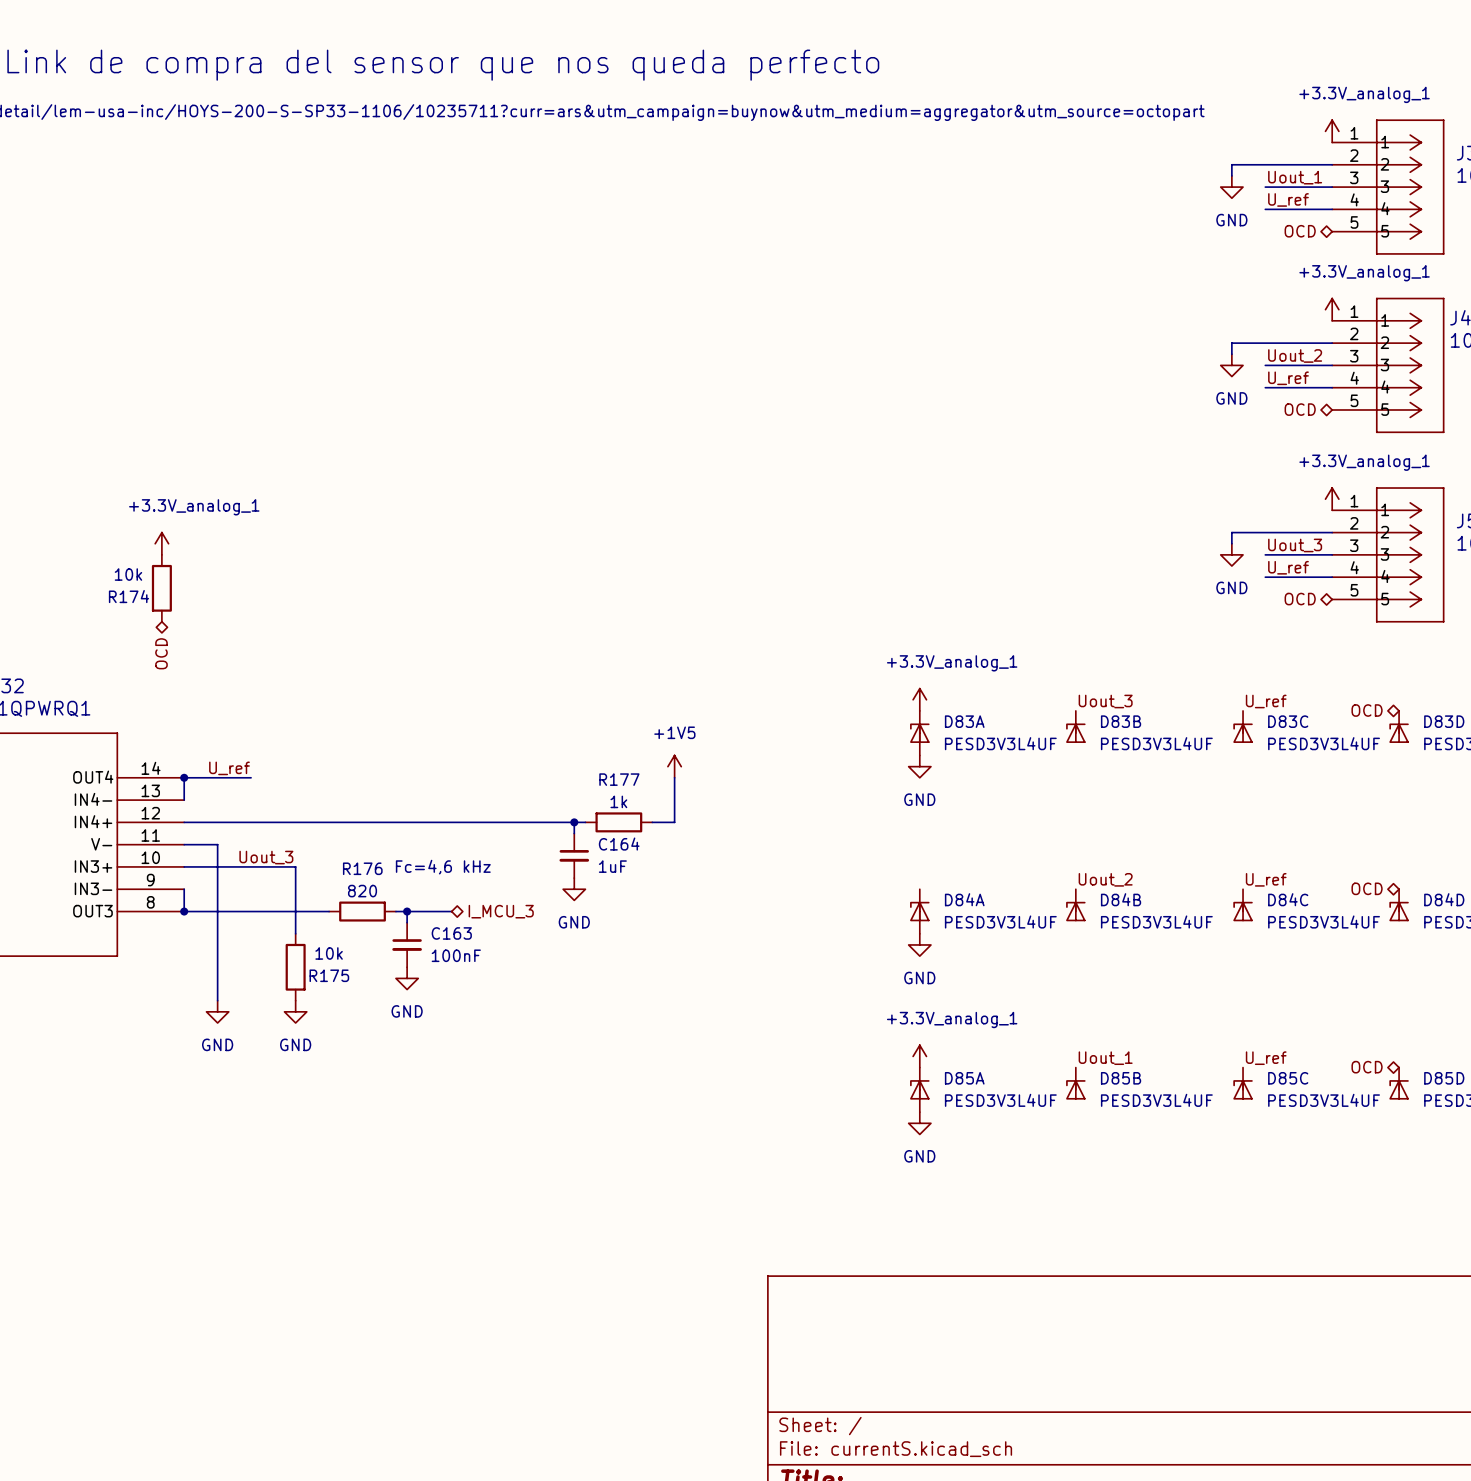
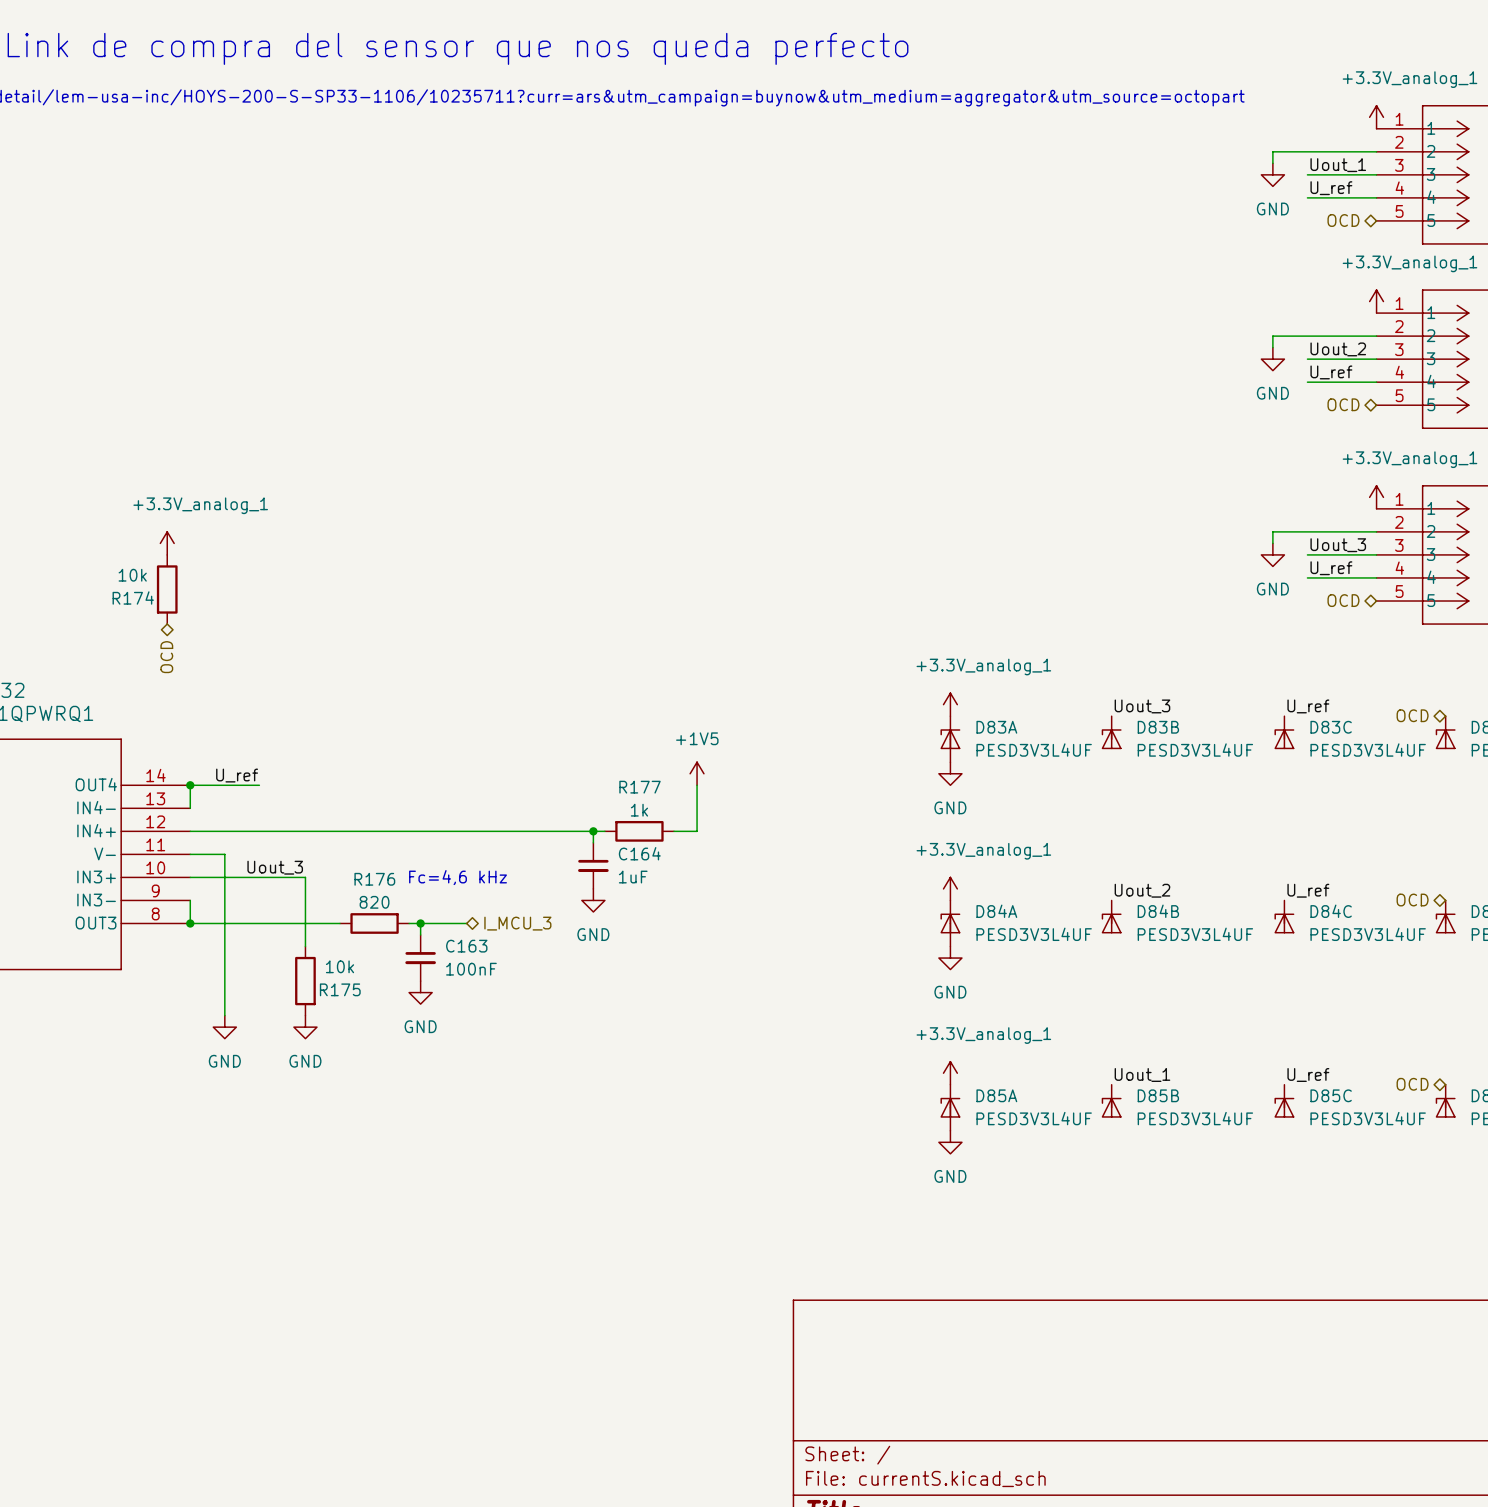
power symbol: none -> +3.3V_analog_1 (950, 888)

